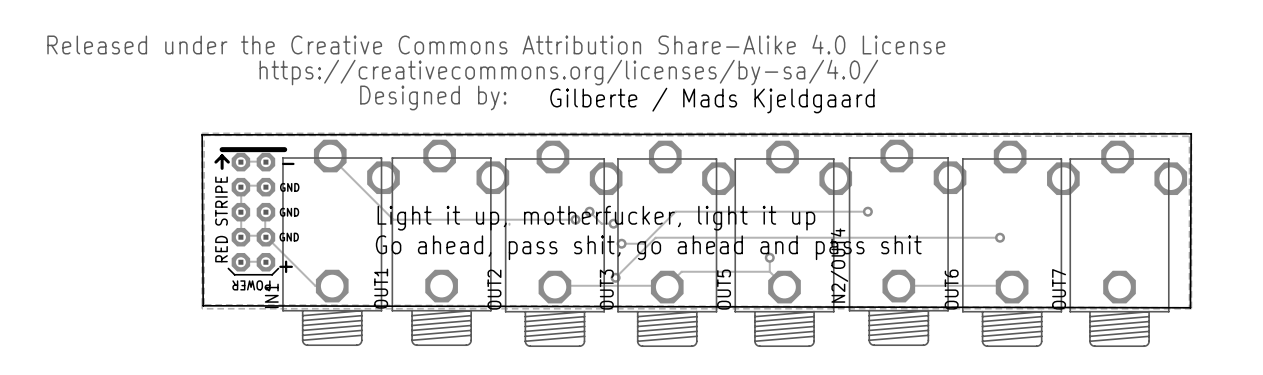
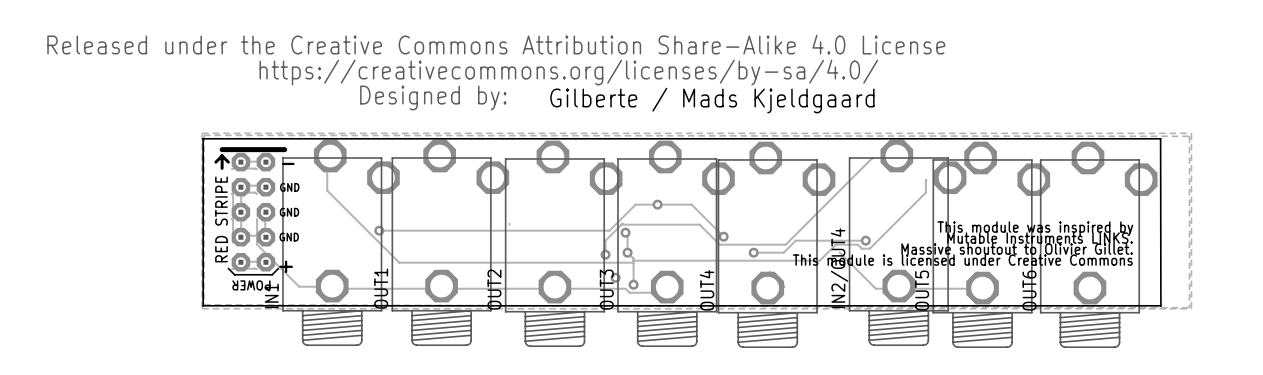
board edge: (1191, 133) (1190, 307) (203, 305) (202, 134) (1191, 133) -> (203, 138) (203, 305) (1160, 305) (1160, 138) (203, 138)
track: (330, 156) (393, 219) (575, 219) -> none
track: none -> (326, 158) (327, 190) (399, 262) (633, 262)
track: none -> (873, 158) (785, 244) (719, 244) (699, 224) (621, 224) (605, 240) (605, 254)
track: none -> (232, 169) (257, 169)
track: none -> (926, 179) (925, 192) (869, 248) (861, 248) (857, 244) (835, 244) (819, 260) (633, 260)
track: none -> (257, 194) (232, 194) (233, 242)
via: none -> (657, 204)
track: (589, 211) (601, 223) (613, 223) -> none
via: (589, 211) -> none
track: (867, 211) (675, 211) (643, 243) (621, 243) -> none
via position: (867, 211) -> (865, 240)
text: Light it up, motherfucker, light it up (596, 218) -> none
track: none -> (257, 219) (257, 244) (299, 286) (327, 286) (329, 288) (625, 288) (629, 292) (655, 292) (660, 288)
via: (575, 219) -> none
via: (613, 223) -> none
text: none -> This module was inspired by (1035, 228)
track: none -> (379, 230) (609, 230) (635, 204) (691, 204) (723, 236)
via: none -> (379, 230)
track: none -> (625, 232) (627, 234) (627, 252) (633, 258) (633, 284)
via: none -> (625, 232)
track: (265, 235) (315, 285) (332, 286) -> none
via: none -> (723, 236)
track: (1000, 237) (655, 237) (615, 277) -> none
via: (1000, 237) -> none
text: none -> Mutable Instruments LINKS. (1040, 238)
track: none -> (865, 240) (795, 240) (783, 252) (753, 252)
via: (621, 243) -> none
OUT5 position: (793, 243) -> (991, 244)
OUT6 position: (1020, 243) -> (1098, 244)
OUT7: (1128, 243) -> none
OUT4: none -> (776, 244)
text: Go ahead, pass shit, go ahead and pass shit (648, 247) -> none
text: none -> Massive shoutout to Olivier Gillet. (1017, 249)
via: none -> (627, 252)
track: none -> (839, 252) (875, 288) (982, 288)
via: none -> (605, 254)
track: (769, 257) (769, 271) (681, 271) (667, 287) (554, 287) -> none
via position: (769, 257) -> (753, 252)
text: none -> This module is licensed under Creative Commons (962, 260)
track: none -> (232, 269) (257, 269)
via: none -> (633, 284)
track: (898, 286) (1012, 287) -> none

